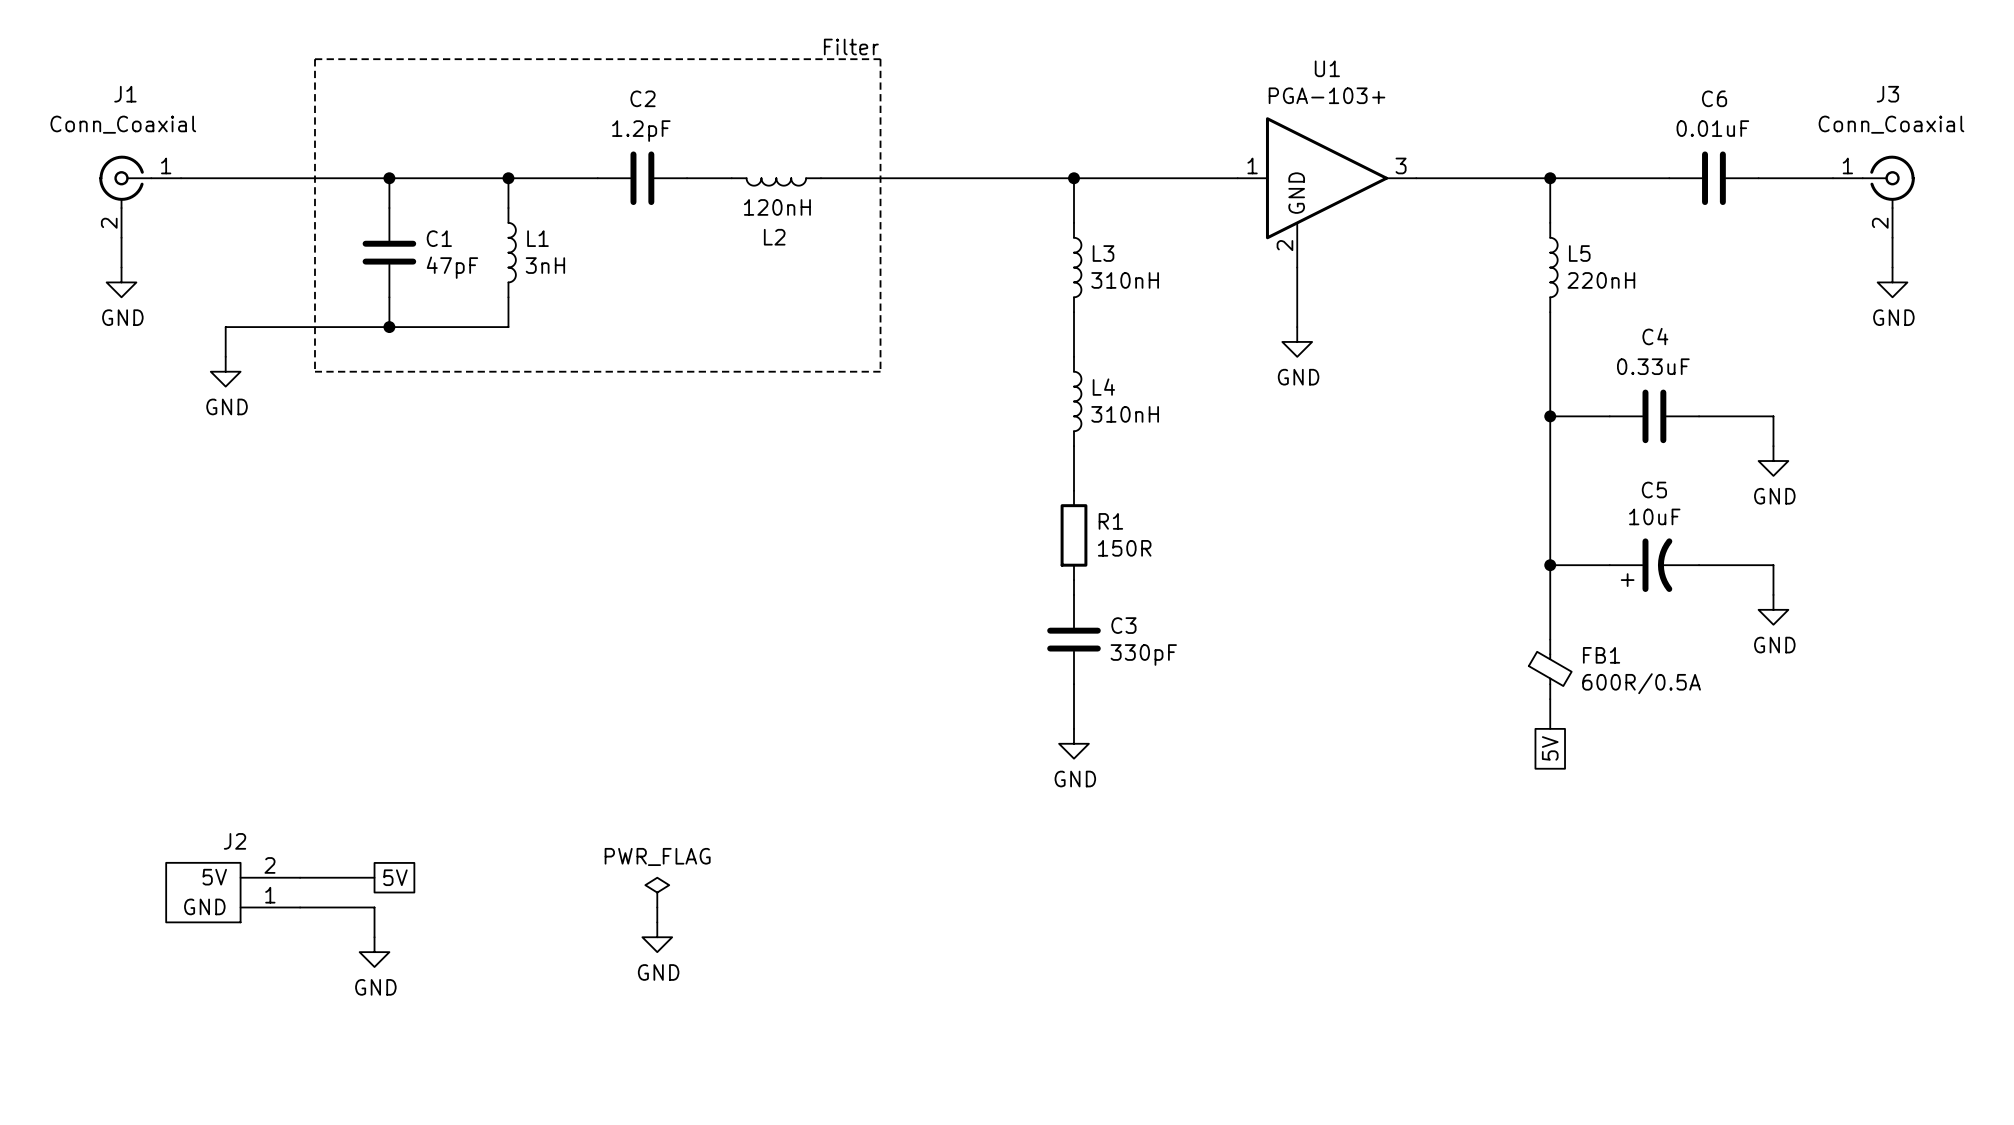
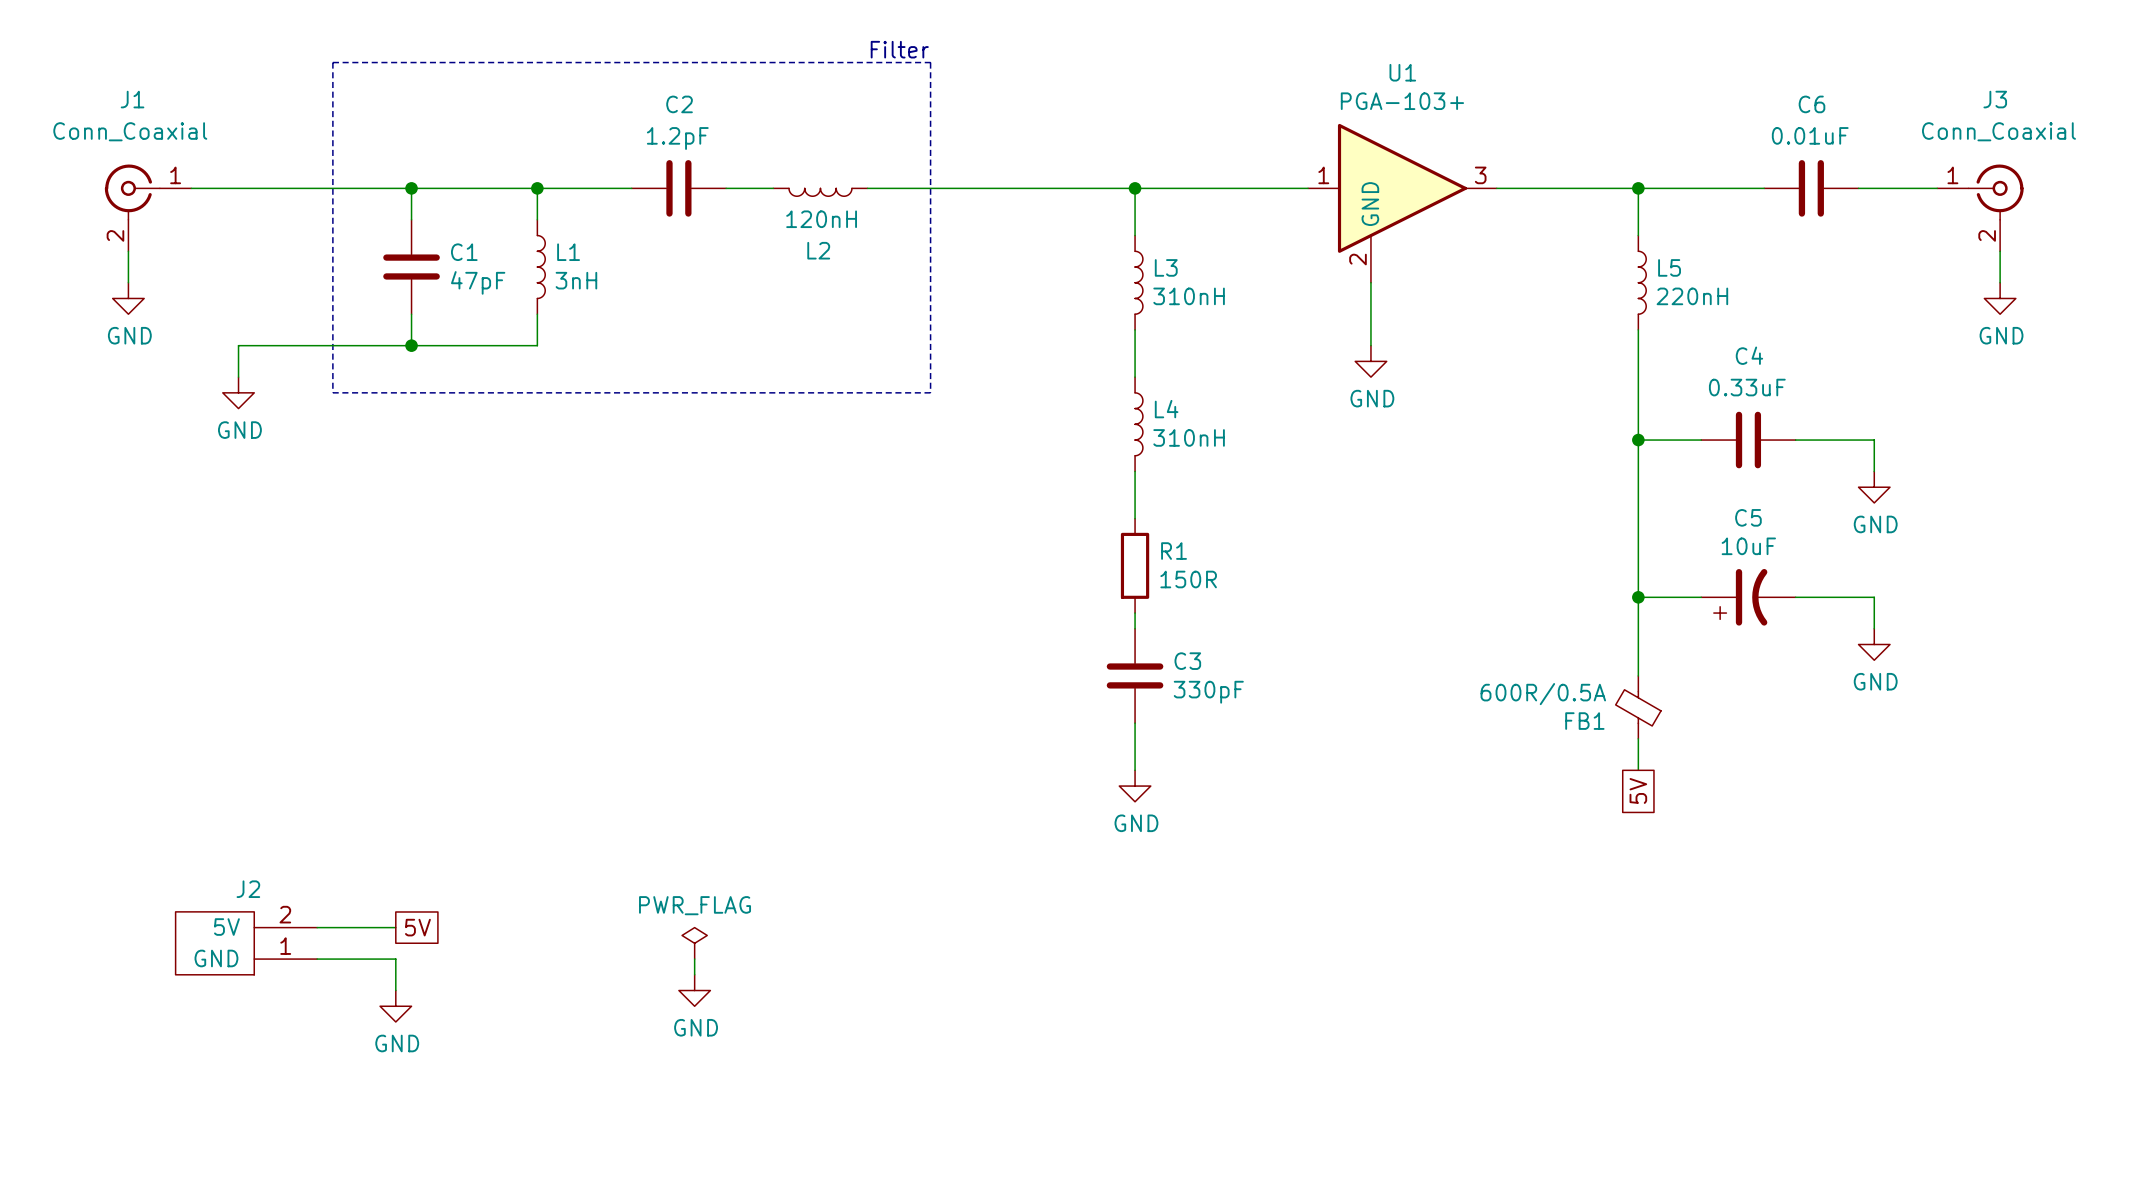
FB1 rotation: 0° (1550, 668) -> 180° (1638, 707)

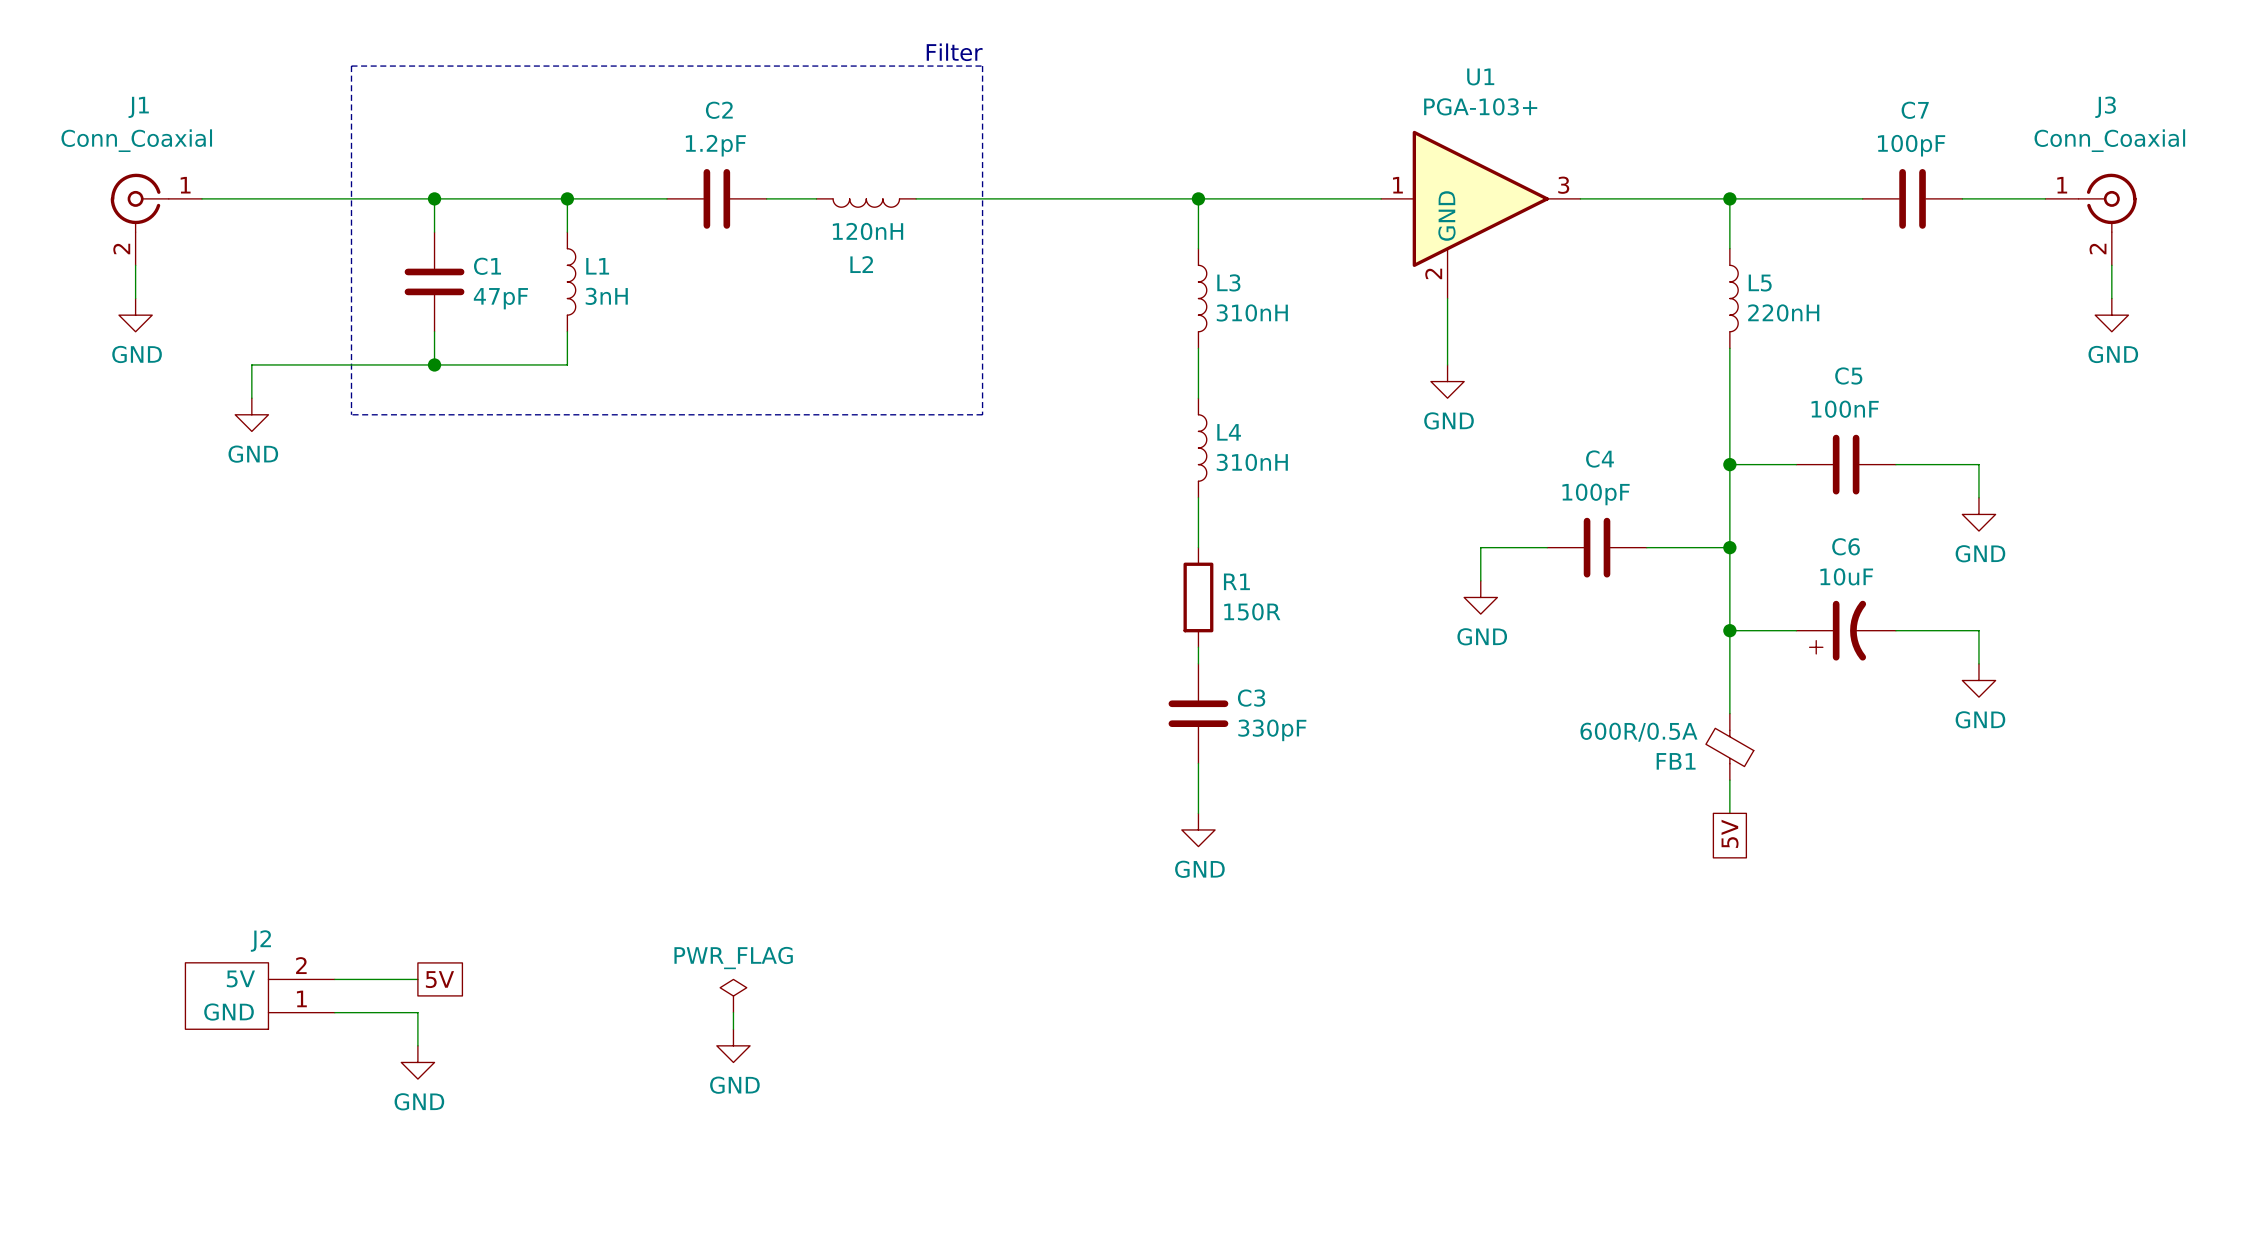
C6 name: C6 (1811, 104) -> C7 (1915, 110)
C6 value: 0.01uF (1810, 135) -> 100pF (1911, 145)
C4 name: C4 (1749, 355) -> C5 (1848, 375)
C4 value: 0.33uF (1747, 387) -> 100nF (1845, 409)
C5 name: C5 (1748, 517) -> C6 (1846, 546)
wire: none -> (1547, 547) (1480, 547) (1480, 580)
C4: none -> 100pF (1597, 547)
wire: none -> (1646, 547) (1729, 547)
junction: none -> (1729, 547)
power symbol: none -> GND (1480, 597)

